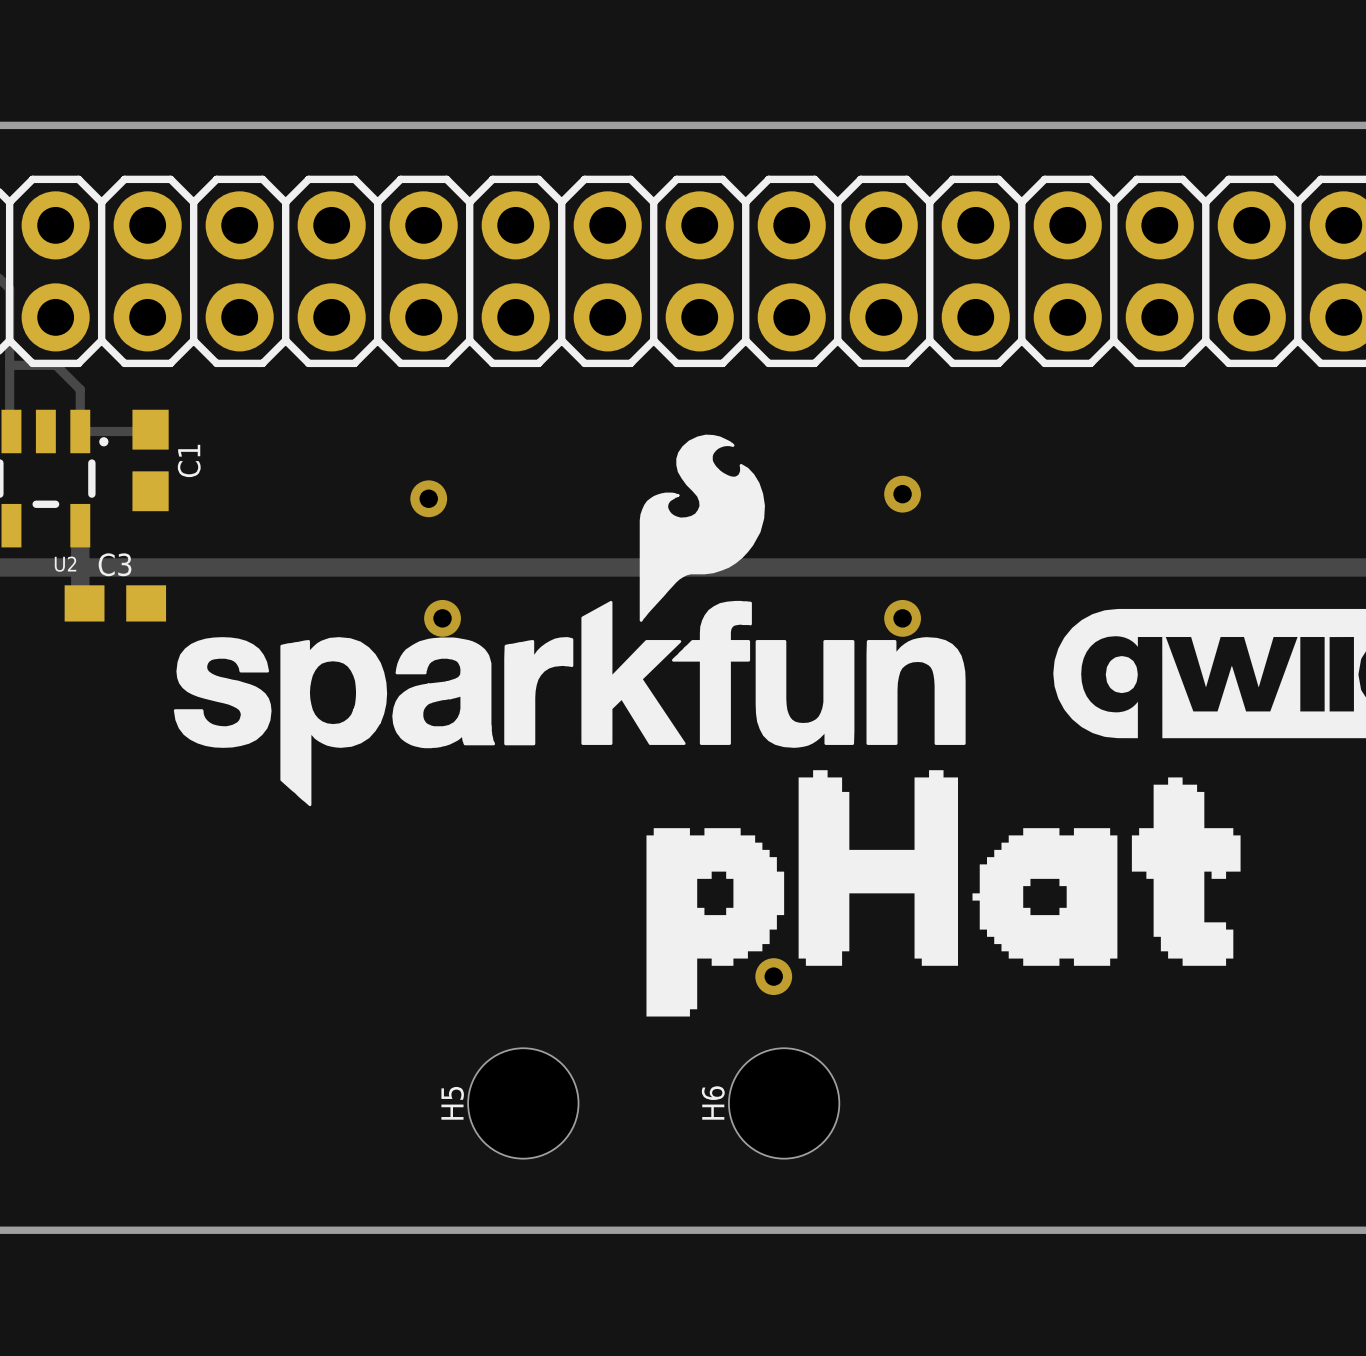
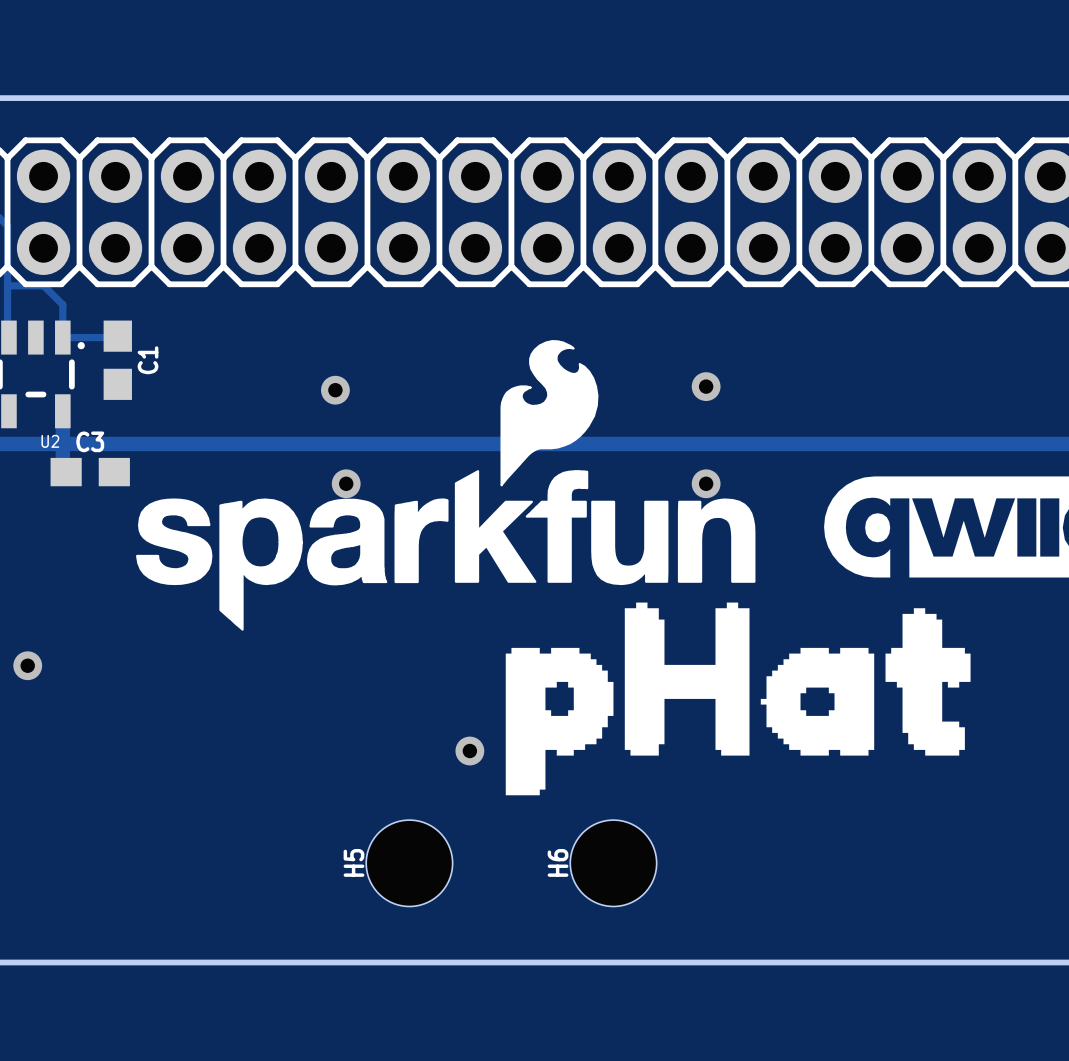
via: none -> (27, 665)
via position: (773, 976) -> (469, 751)

